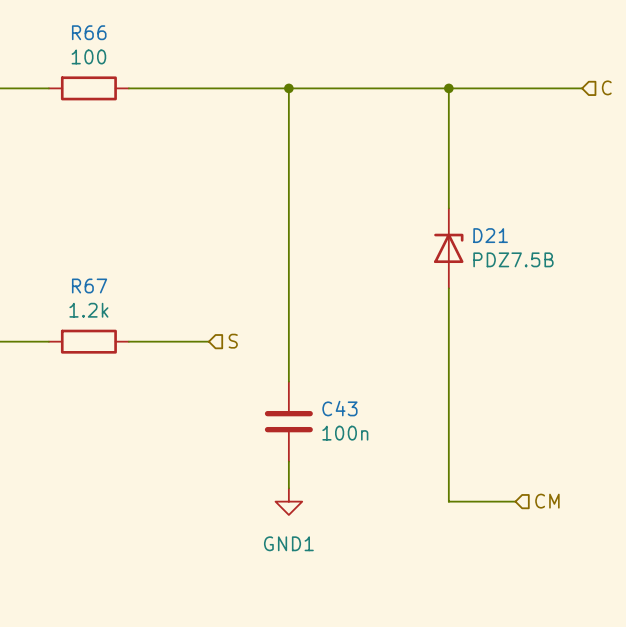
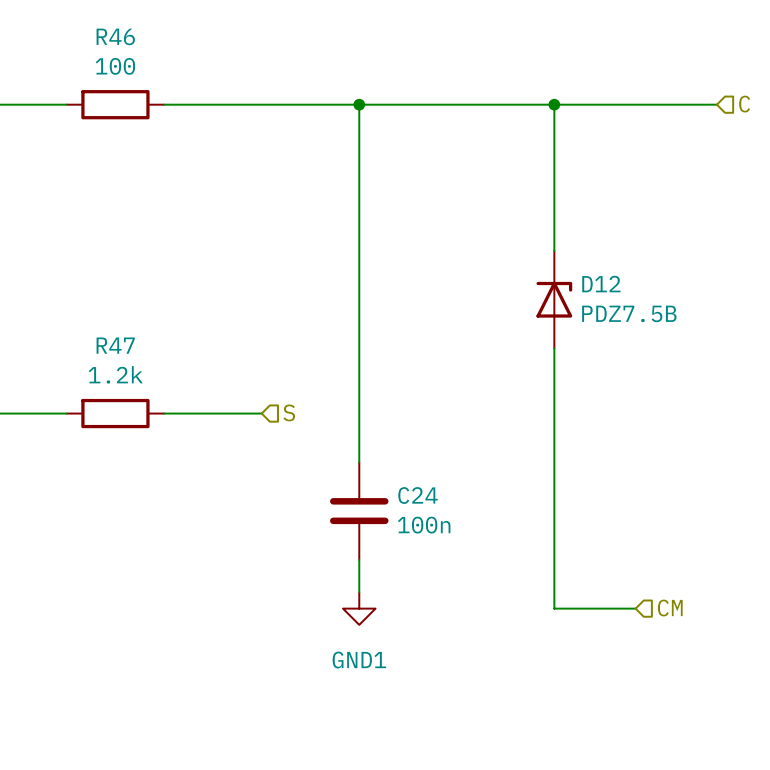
R66 name: R66 (89, 32) -> R46 (115, 36)
D21 name: D21 (490, 235) -> D12 (601, 284)
R67 name: R67 (89, 285) -> R47 (115, 345)
C43 name: C43 (339, 408) -> C24 (418, 495)

